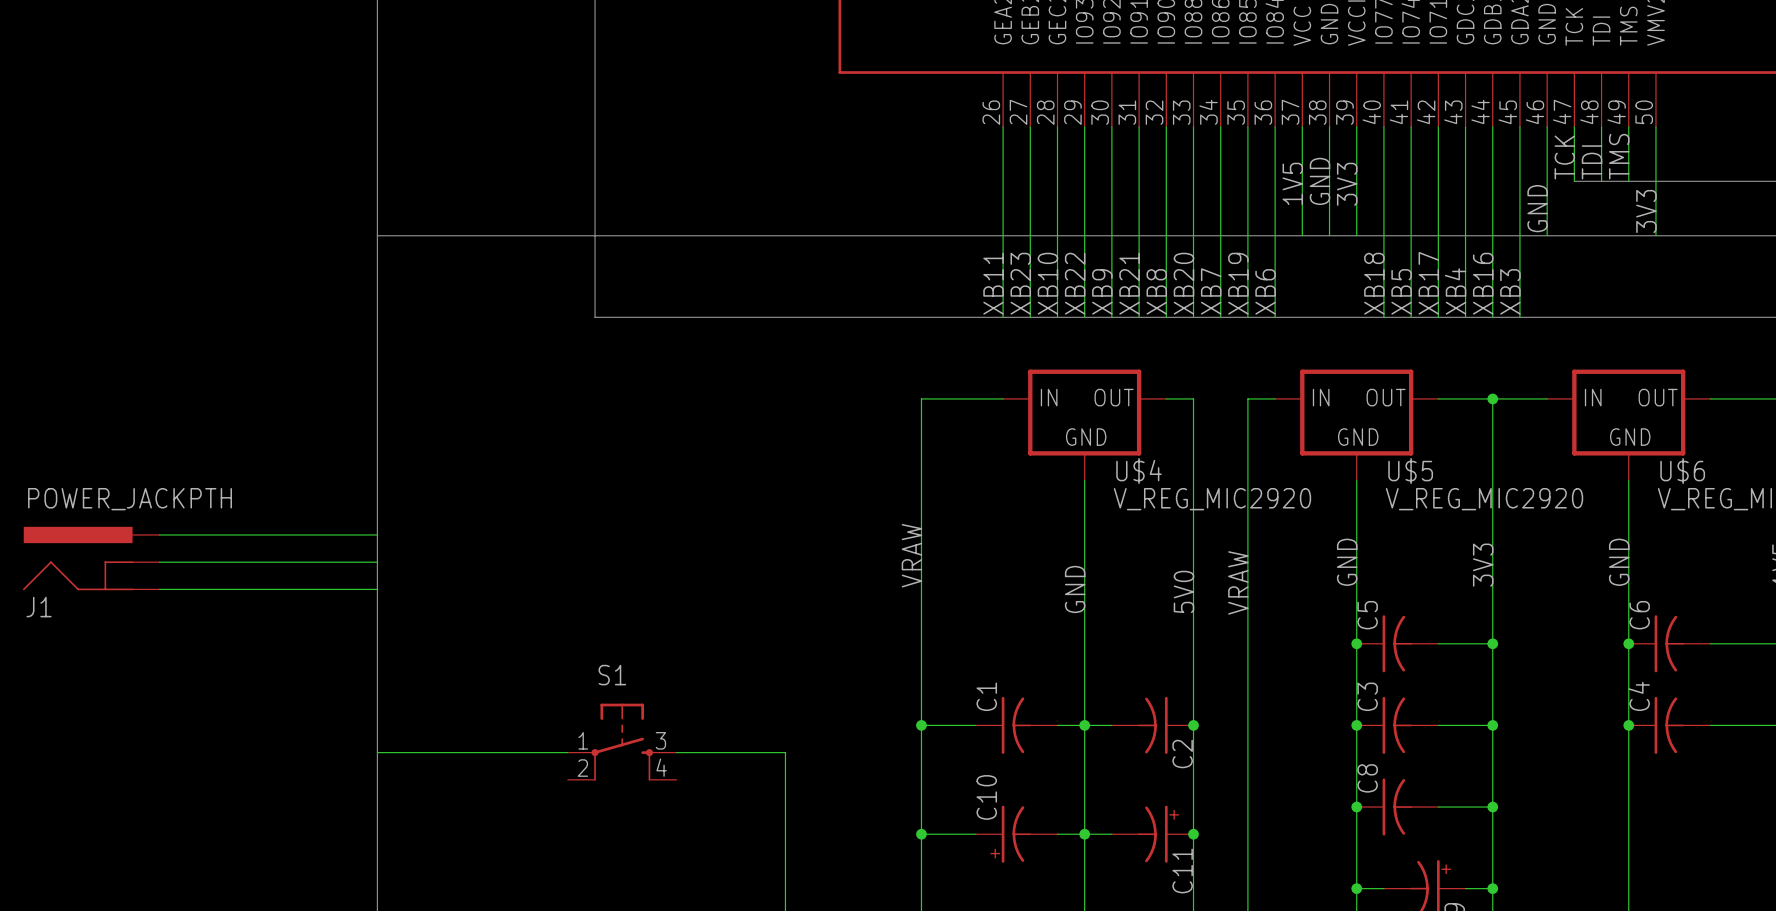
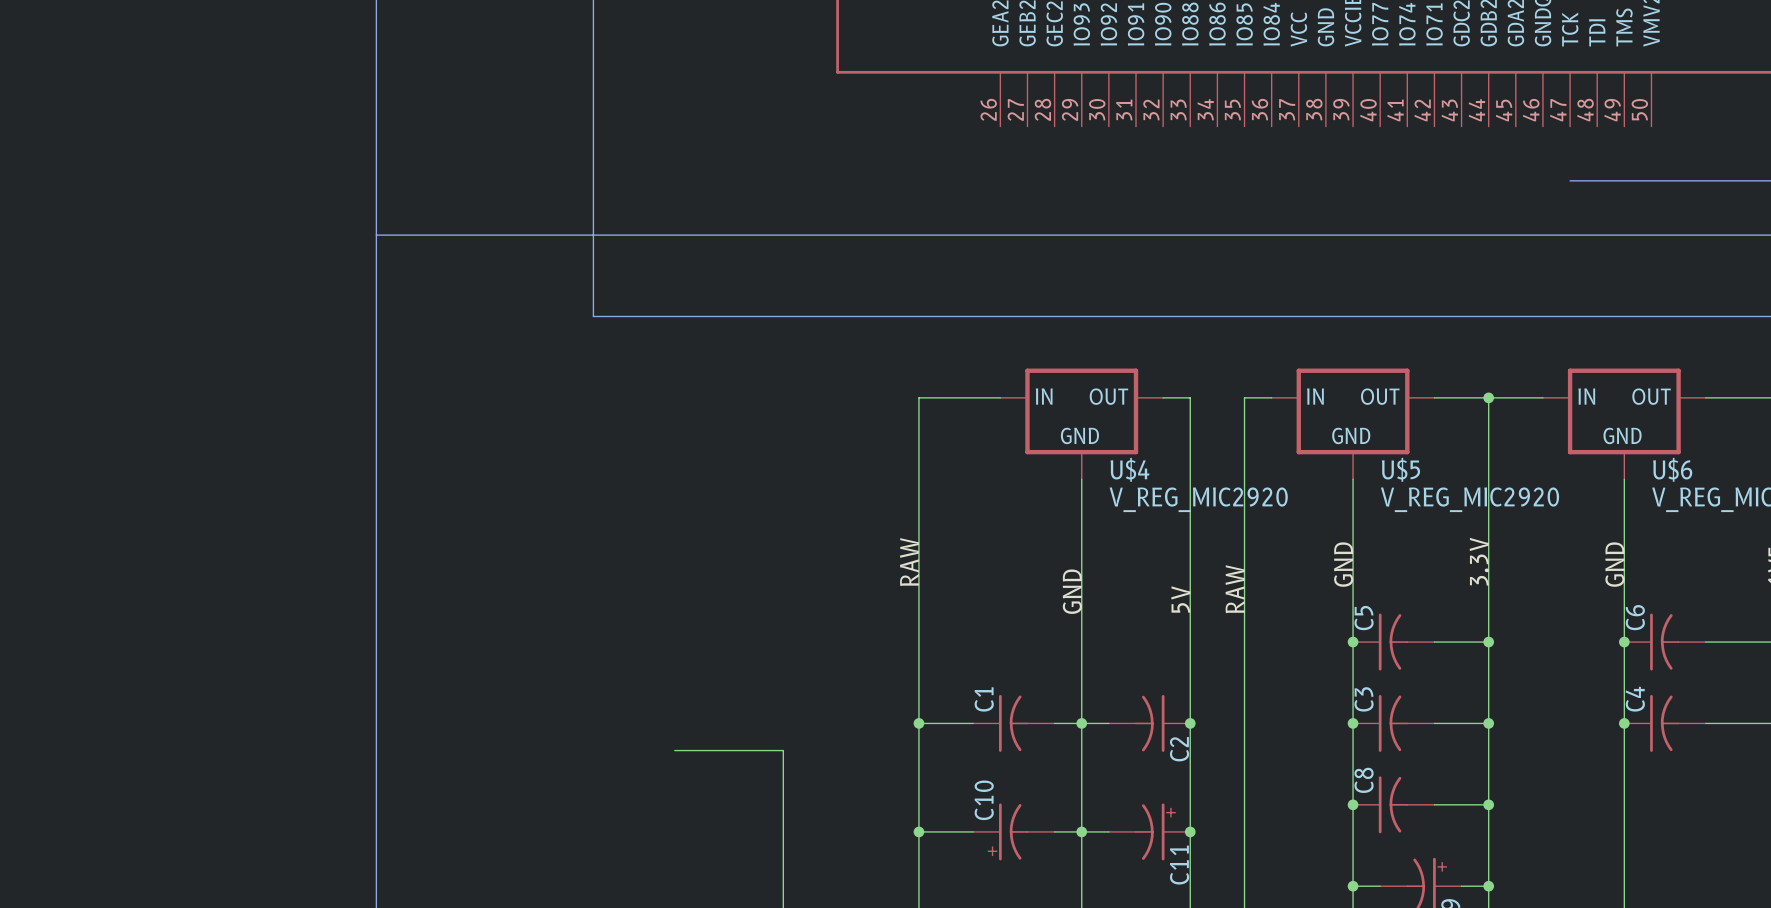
wire: (1003, 126) (1003, 317) -> none
wire: (1030, 126) (1030, 317) -> none
wire: (1057, 126) (1057, 317) -> none
wire: (1084, 126) (1084, 317) -> none
wire: (1111, 126) (1111, 317) -> none
wire: (1139, 126) (1139, 317) -> none
wire: (1166, 126) (1166, 317) -> none
wire: (1193, 126) (1193, 317) -> none
wire: (1220, 126) (1220, 317) -> none
wire: (1247, 126) (1247, 317) -> none
wire: (1275, 126) (1275, 317) -> none
wire: (1302, 126) (1302, 235) -> none
wire: (1329, 126) (1329, 235) -> none
wire: (1356, 126) (1356, 235) -> none
wire: (1383, 126) (1383, 317) -> none
wire: (1411, 126) (1411, 317) -> none
wire: (1438, 126) (1438, 317) -> none
wire: (1465, 126) (1465, 317) -> none
wire: (1492, 126) (1492, 317) -> none
wire: (1519, 126) (1519, 317) -> none
wire: (1547, 126) (1547, 235) -> none
wire: (1574, 126) (1574, 181) -> none
wire: (1601, 126) (1601, 181) -> none
wire: (1628, 126) (1628, 181) -> none
wire: (1655, 126) (1655, 235) -> none
label: TMS (1619, 156) -> none
label: TCK (1564, 157) -> none
label: TDI (1592, 162) -> none
label: GND (1320, 181) -> none
label: 1V5 (1292, 183) -> none
label: 3V3 (1347, 184) -> none
label: GND (1537, 208) -> none
label: 3V3 (1646, 211) -> none
label: XB11 (993, 283) -> none
label: XB23 (1020, 283) -> none
label: XB10 (1047, 283) -> none
label: XB22 (1075, 283) -> none
label: XB21 (1129, 283) -> none
label: XB20 (1183, 283) -> none
label: XB19 (1238, 283) -> none
label: XB18 (1374, 283) -> none
label: XB17 (1428, 283) -> none
label: XB16 (1483, 283) -> none
label: XB9 (1102, 291) -> none
label: XB8 (1156, 291) -> none
label: XB7 (1211, 291) -> none
label: XB6 (1265, 291) -> none
label: XB5 (1401, 291) -> none
label: XB4 (1455, 291) -> none
label: XB3 (1510, 291) -> none
wire: (159, 534) (377, 534) -> none
label: VRAW (911, 555) -> RAW (909, 562)
J1: POWER_JACKPTH (91, 558) -> none
wire: (159, 562) (377, 562) -> none
label: 3V3 (1483, 565) -> 3.3V (1479, 561)
label: VRAW (1238, 582) -> RAW (1235, 589)
wire: (159, 589) (377, 589) -> none
label: 5V0 (1183, 591) -> 5V (1180, 599)
S1: (622, 742) -> none
wire: (377, 752) (567, 752) -> none

